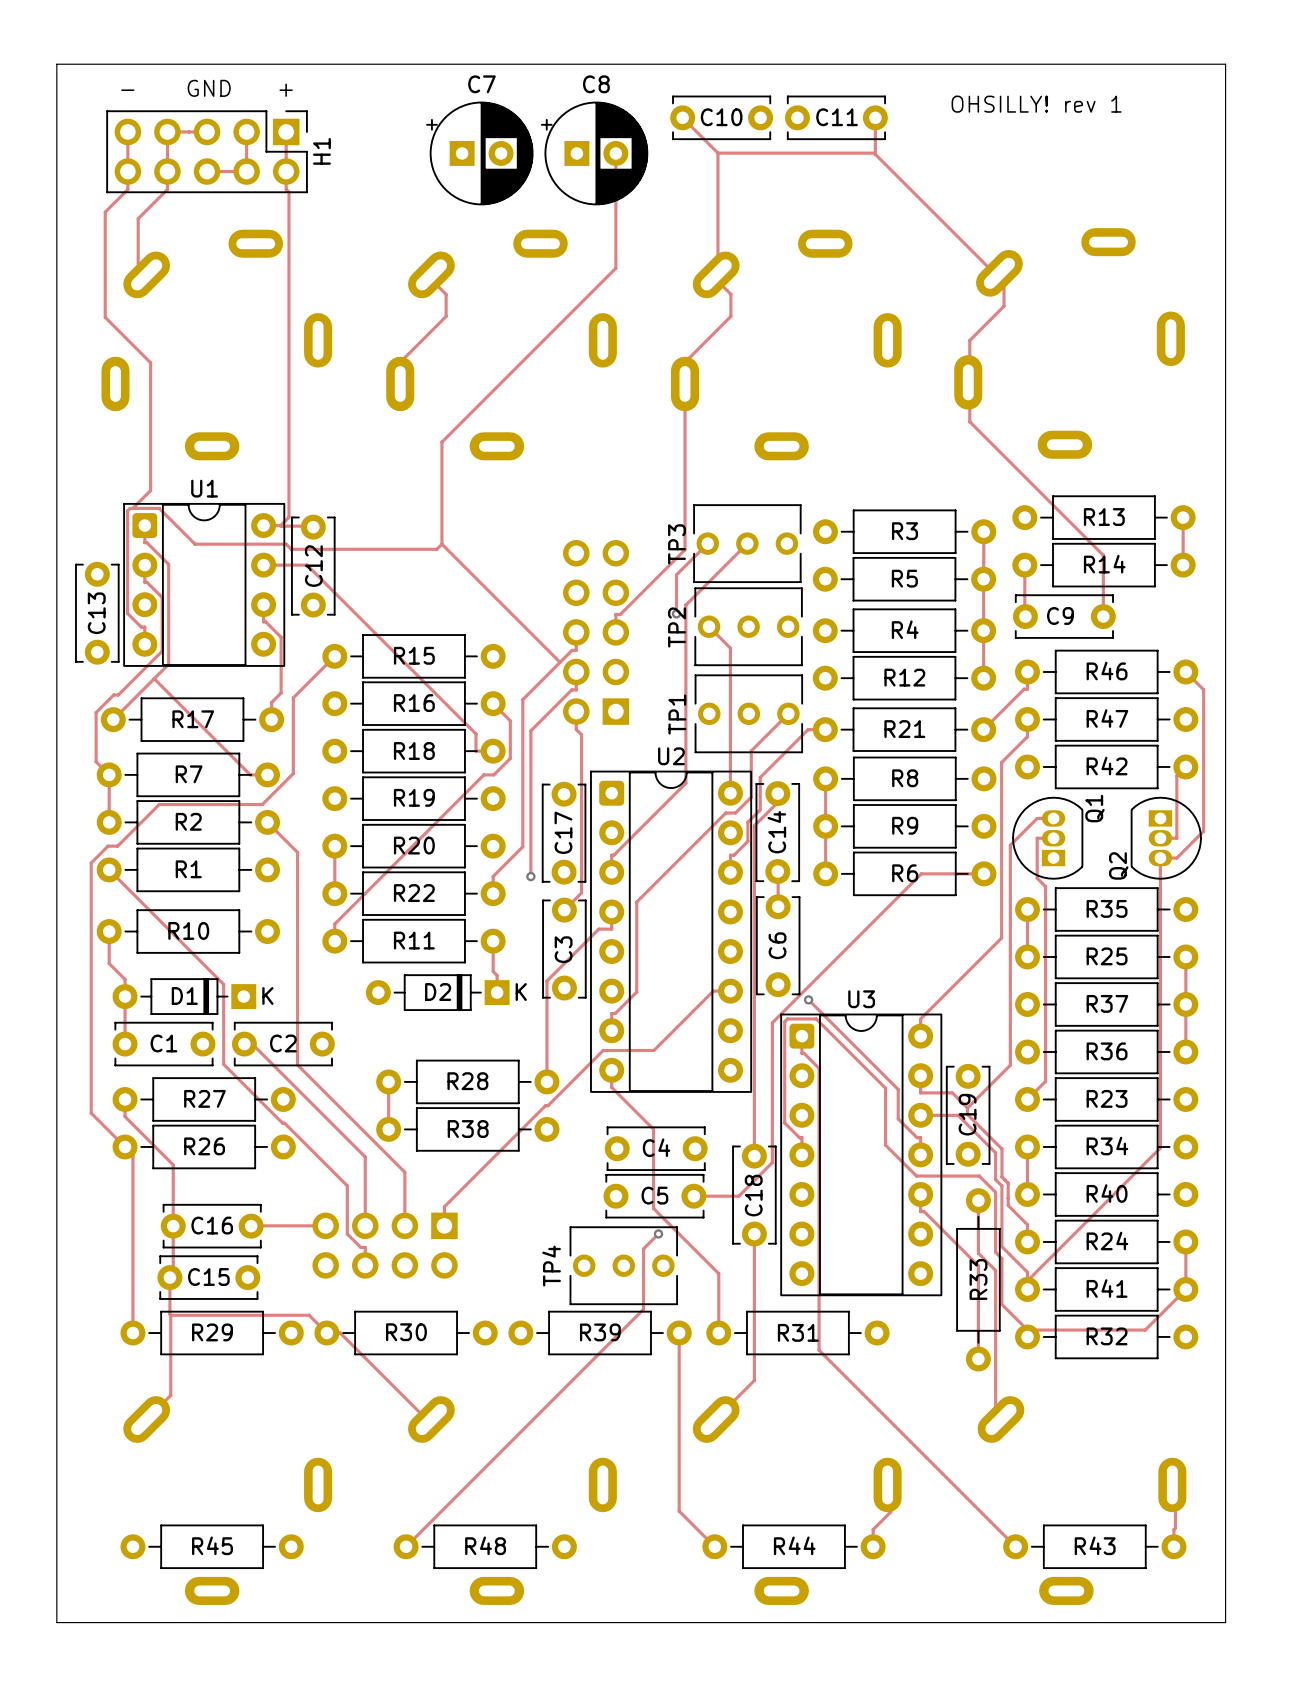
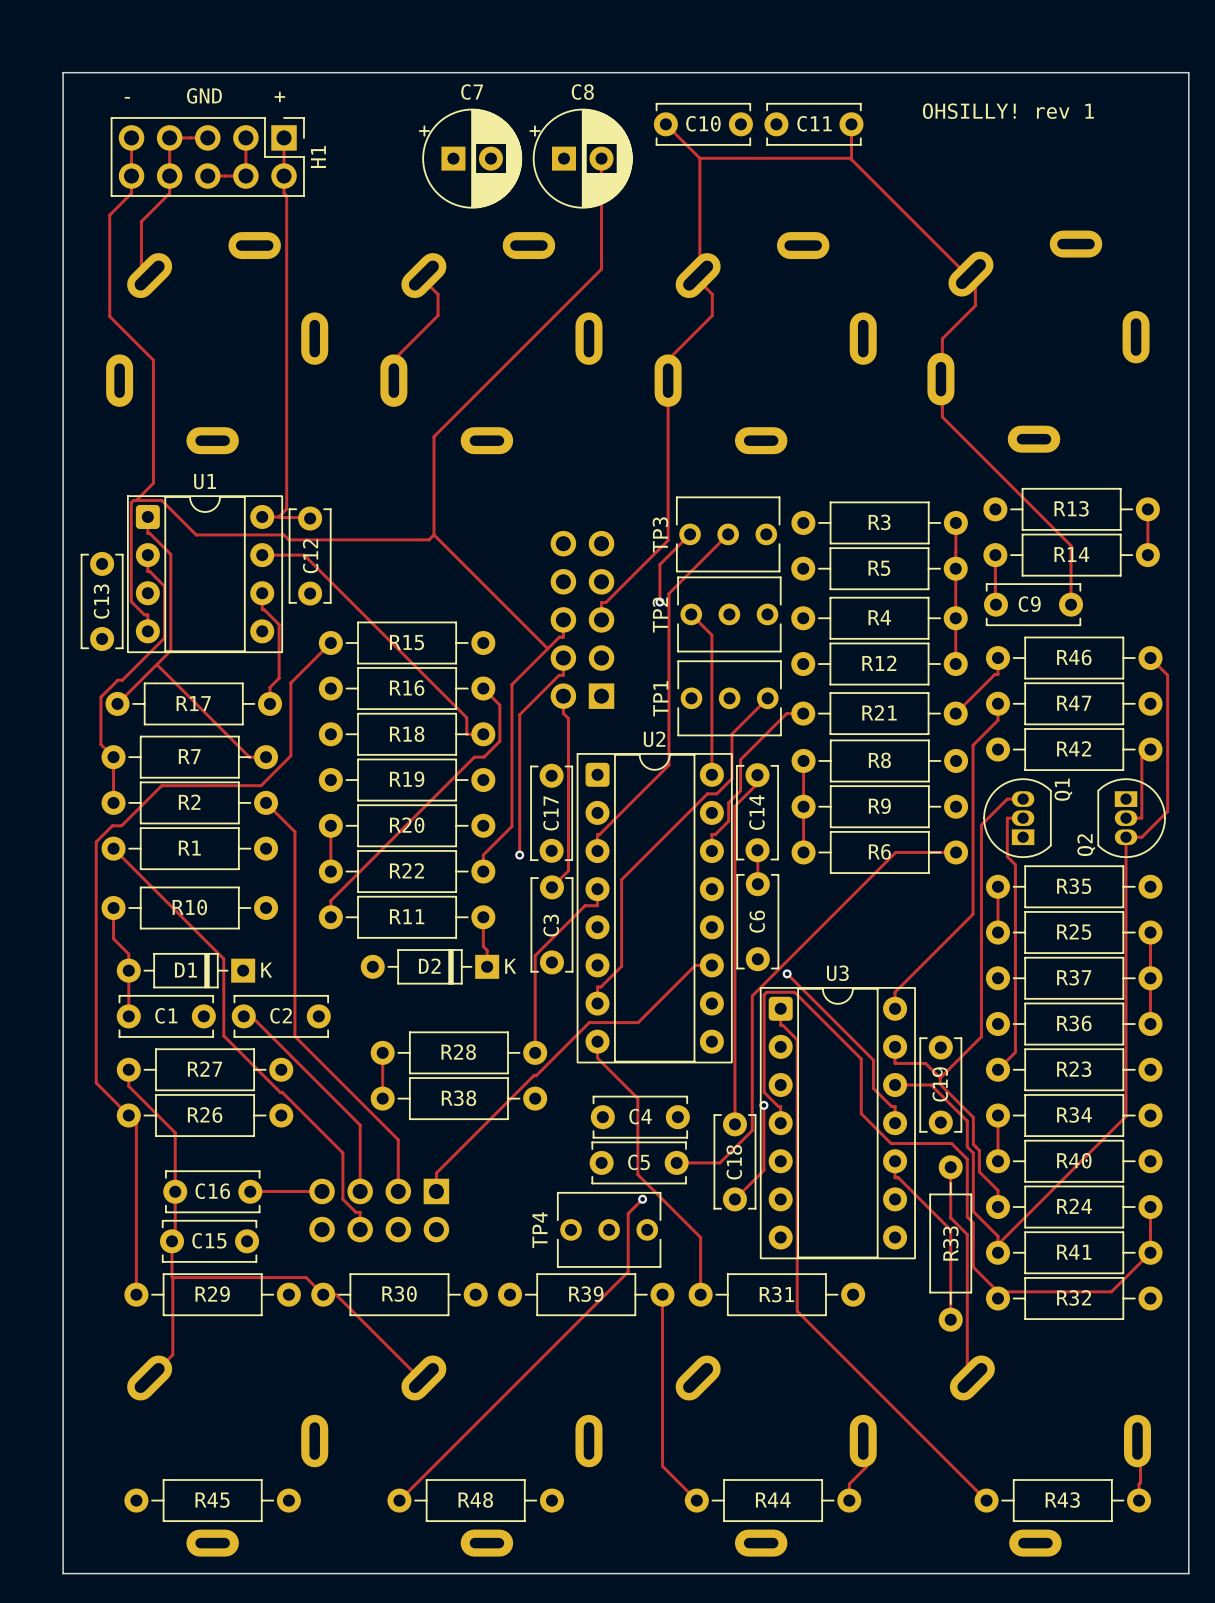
via: none -> (763, 1105)
track: (754, 1234) (754, 1380) (716, 1419) -> (734, 1199) (763, 1170) (763, 1105)

